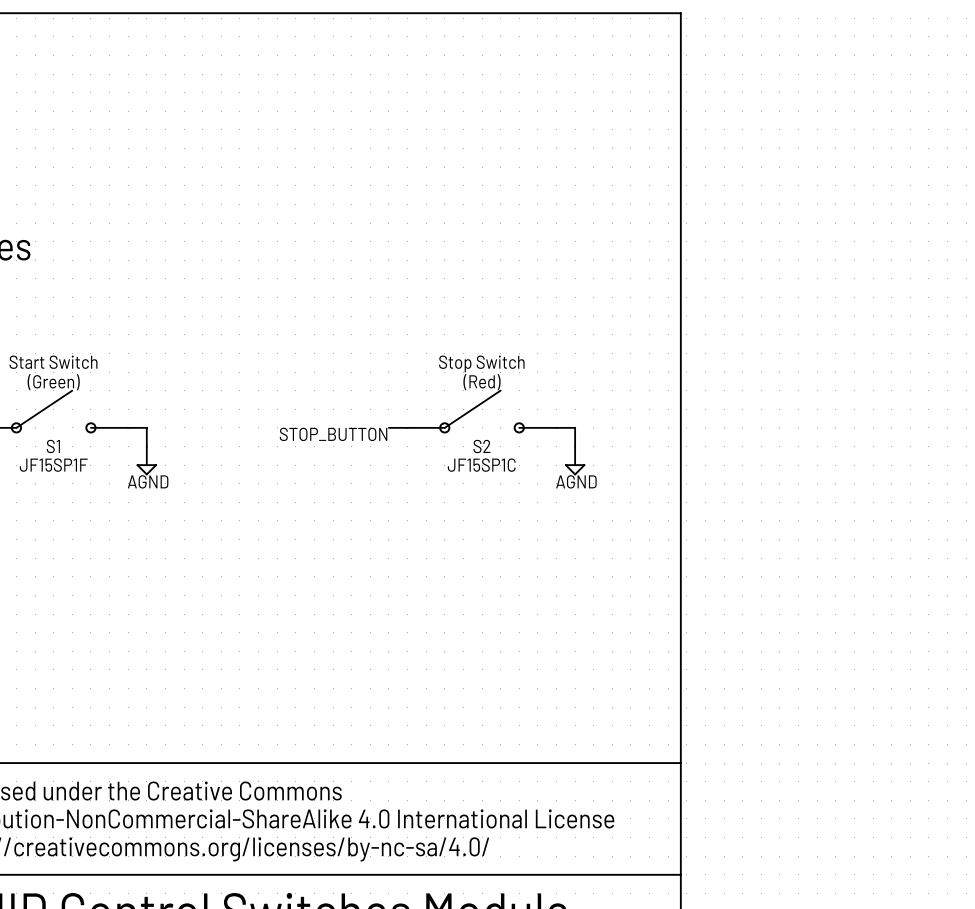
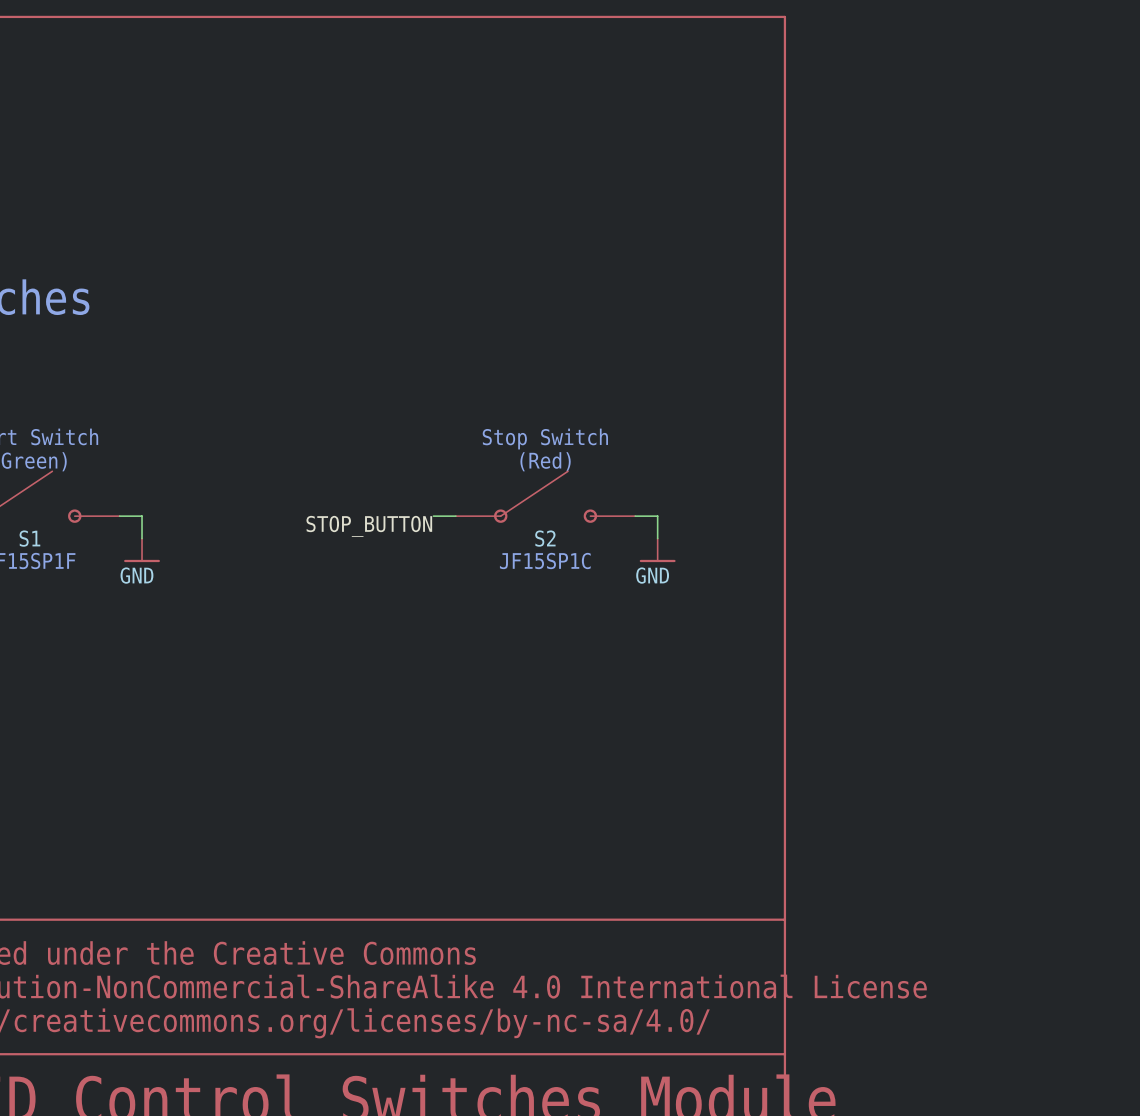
power symbol: AGND (146, 460) -> GND (142, 550)
power symbol: AGND (575, 460) -> GND (657, 550)

